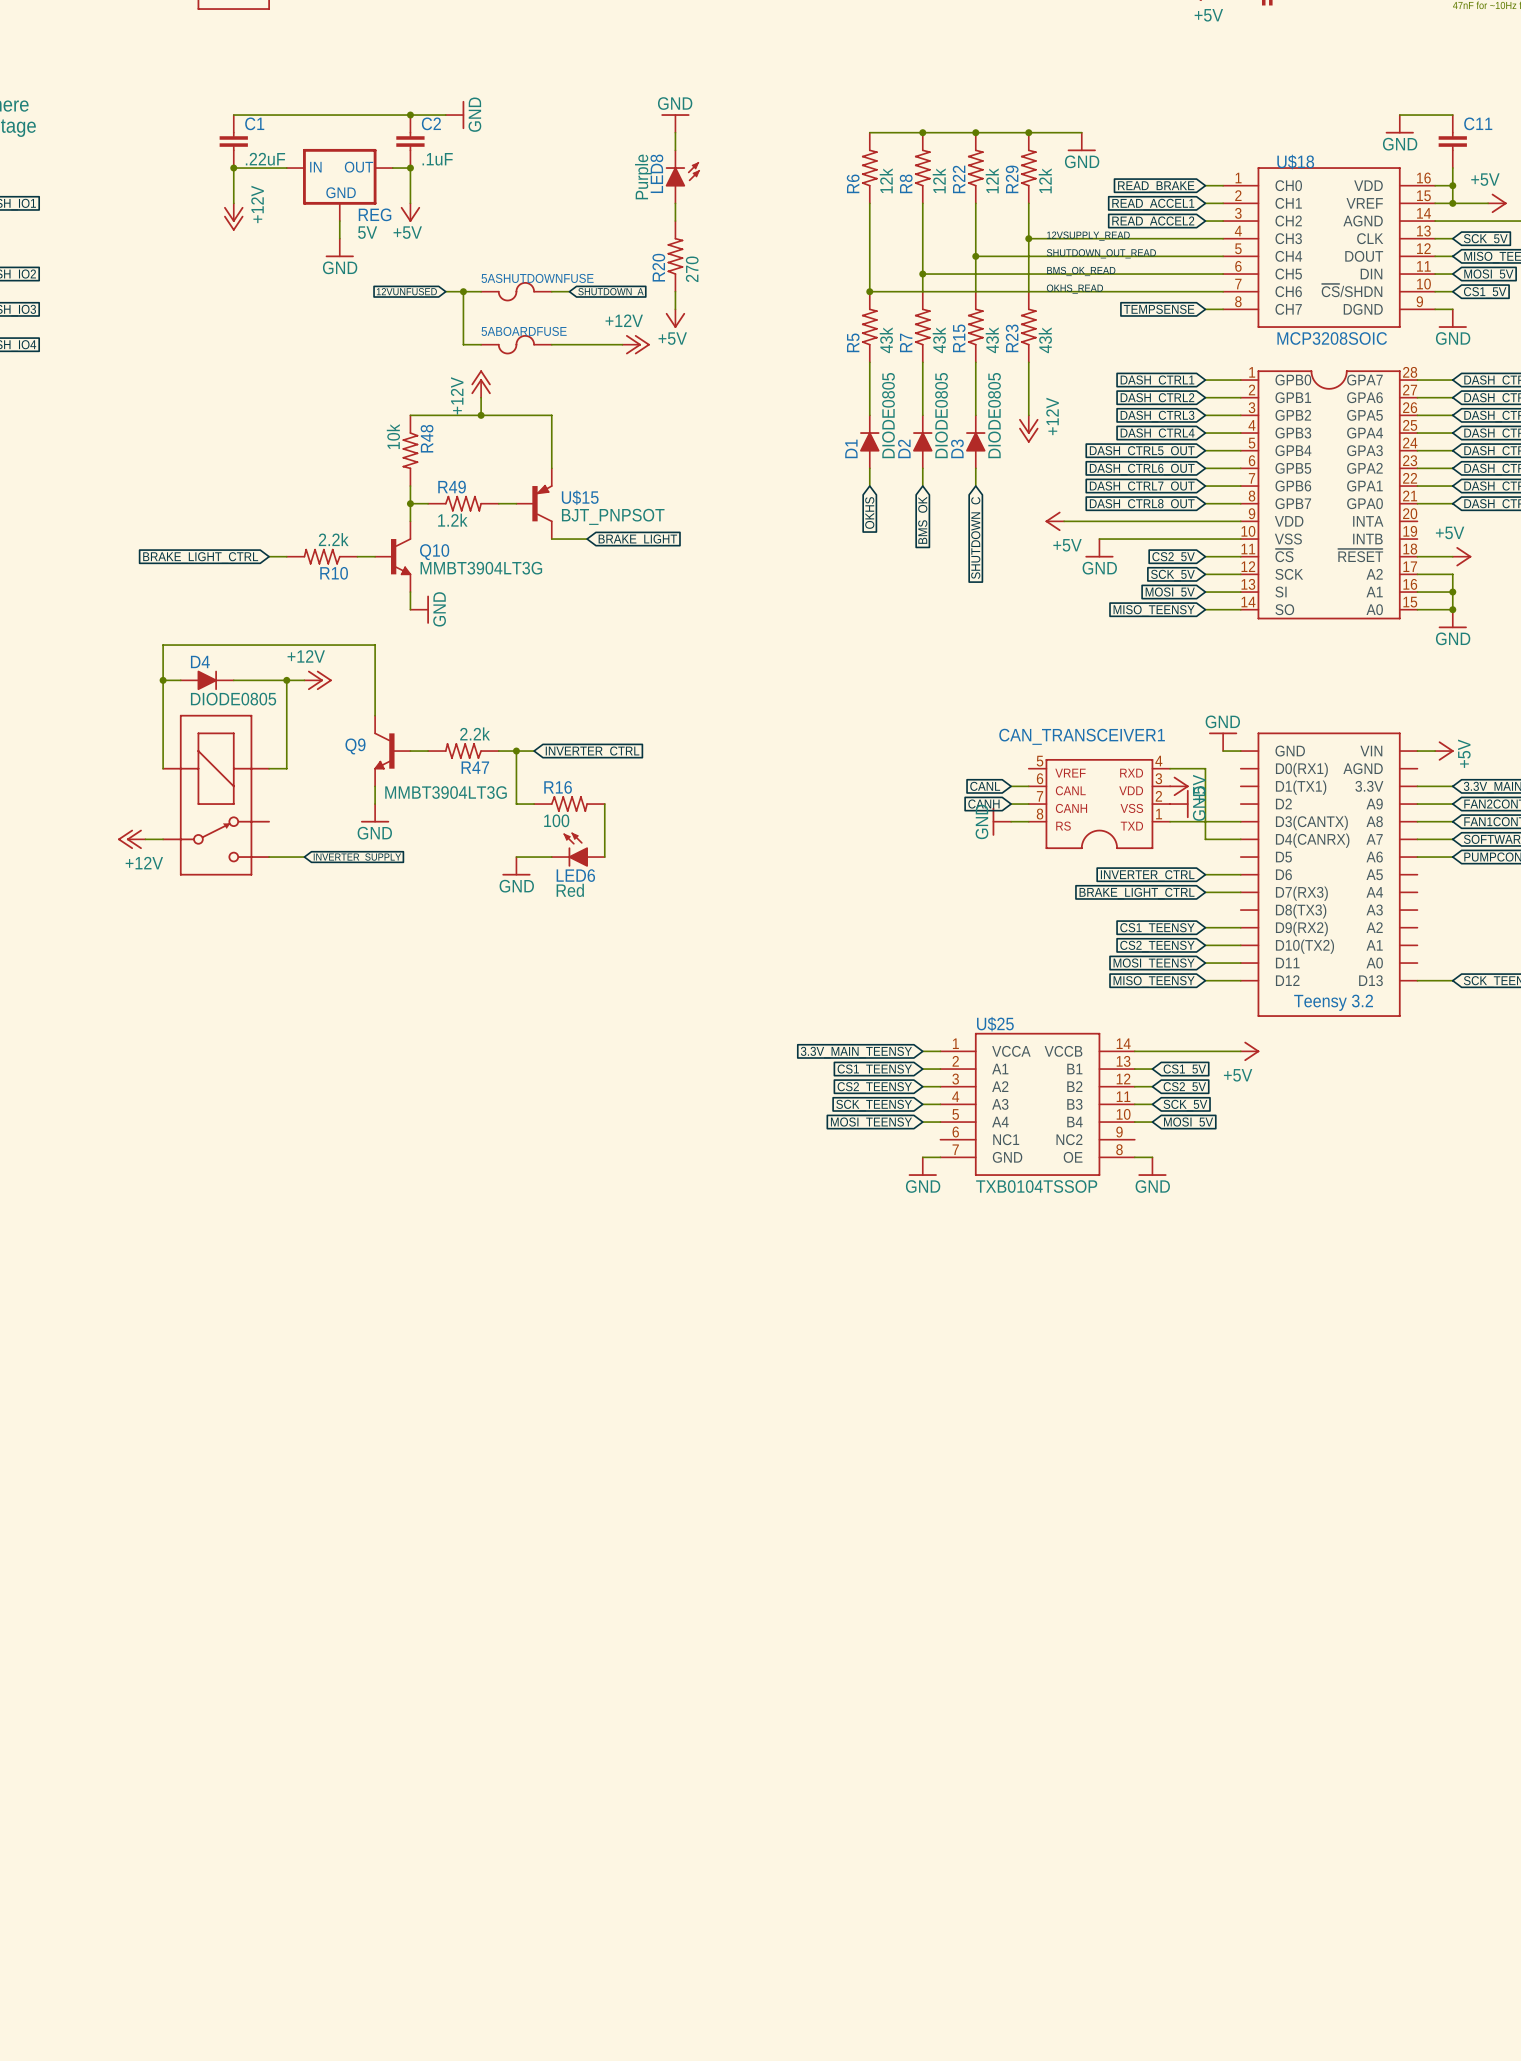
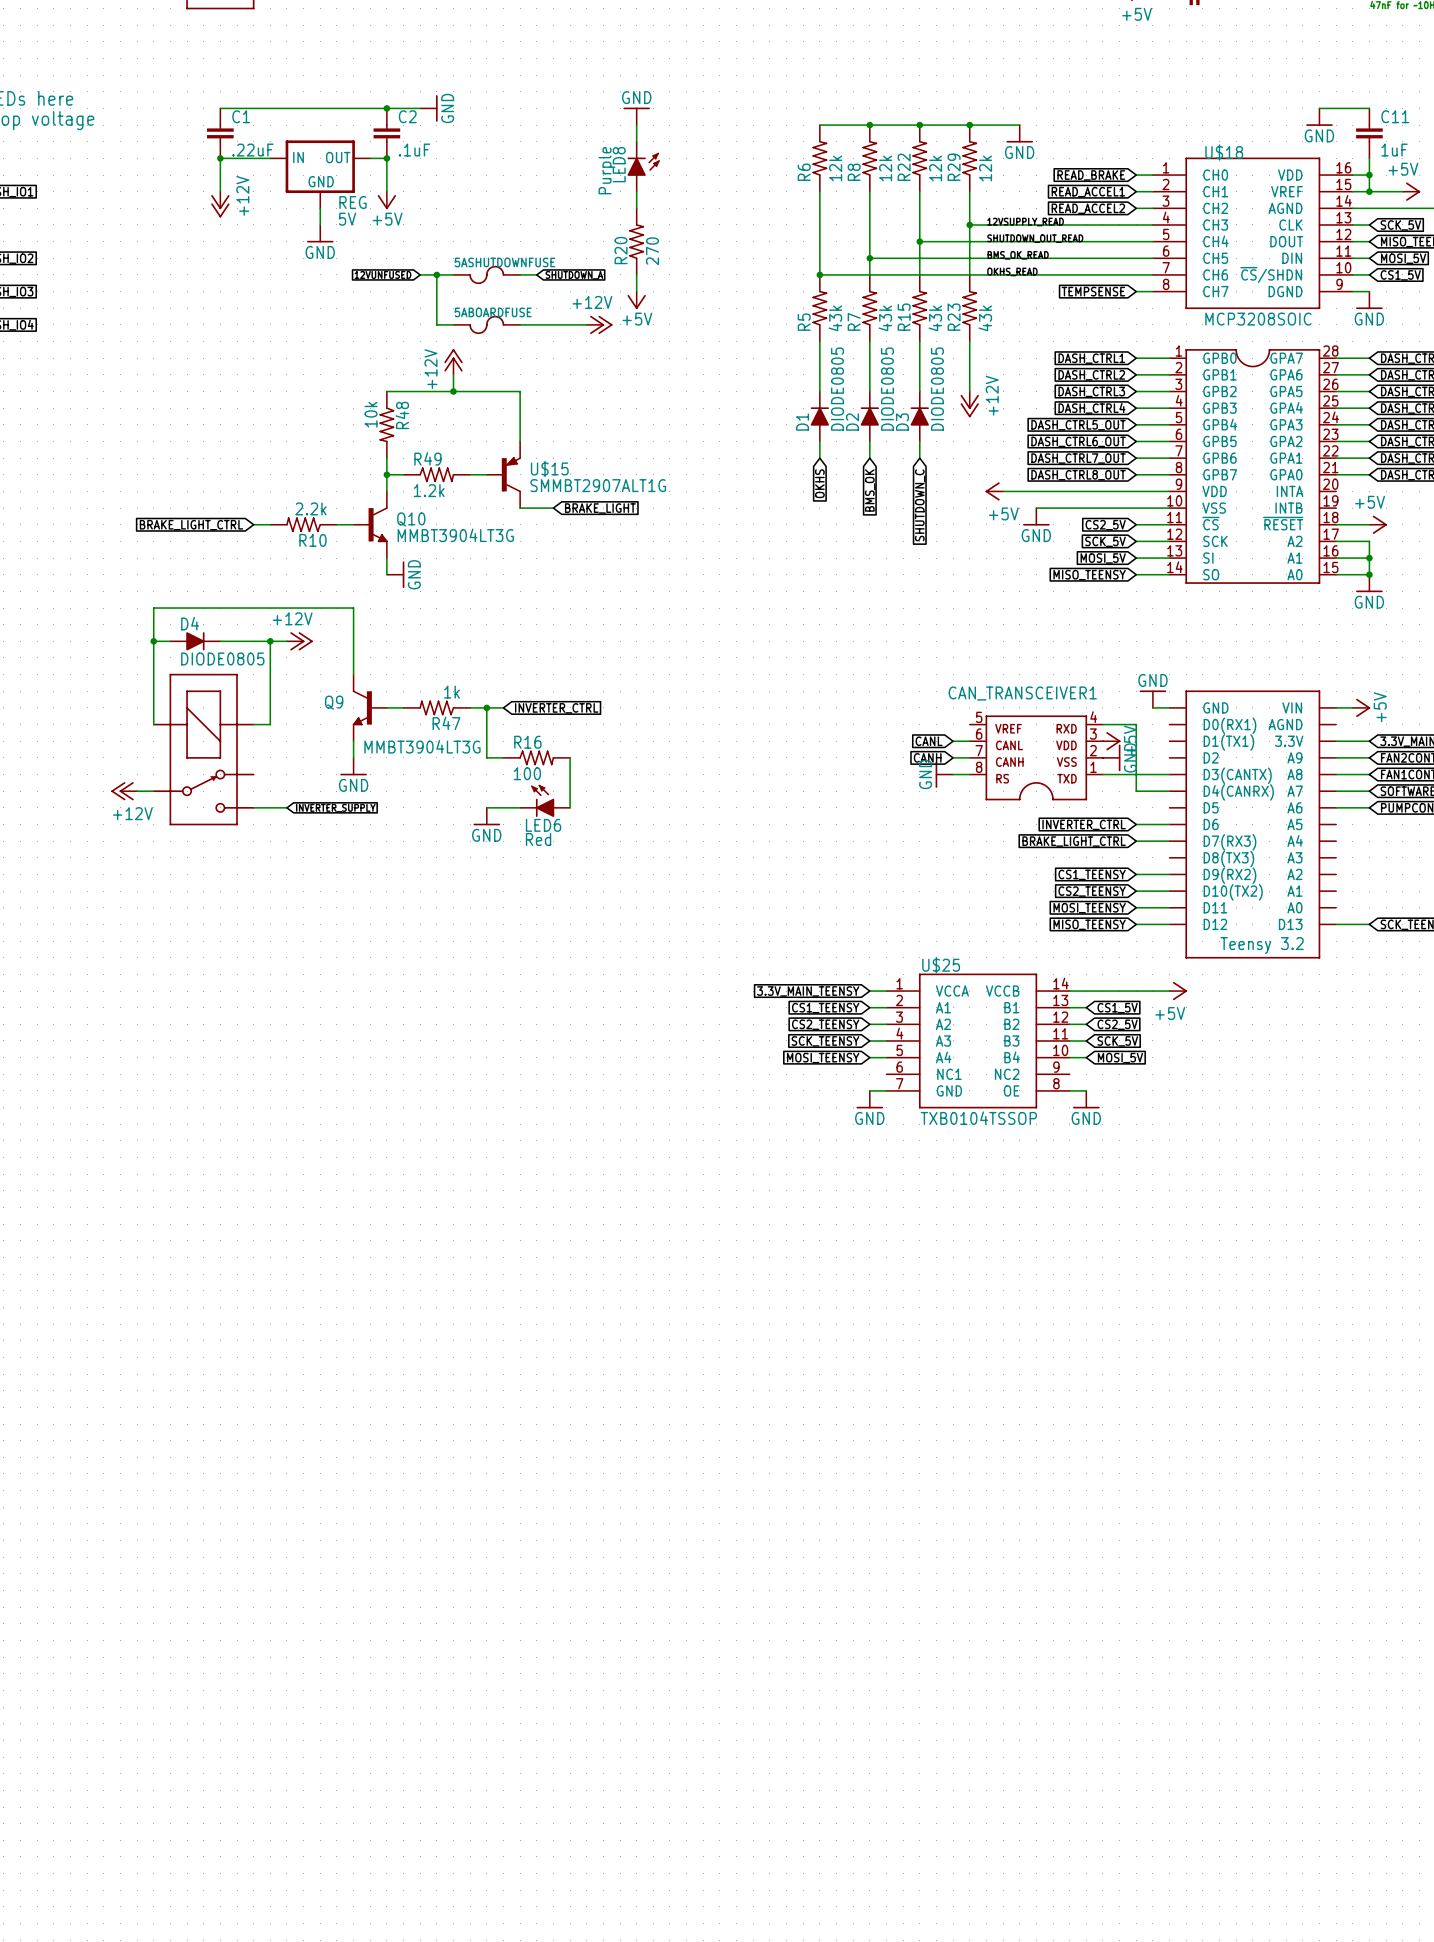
C11 value: none -> 1uF (1394, 150)
U$15 value: BJT_PNPSOT (613, 516) -> SMMBT2907ALT1G (598, 485)
R47 value: 2.2k (475, 733) -> 1k (451, 692)

